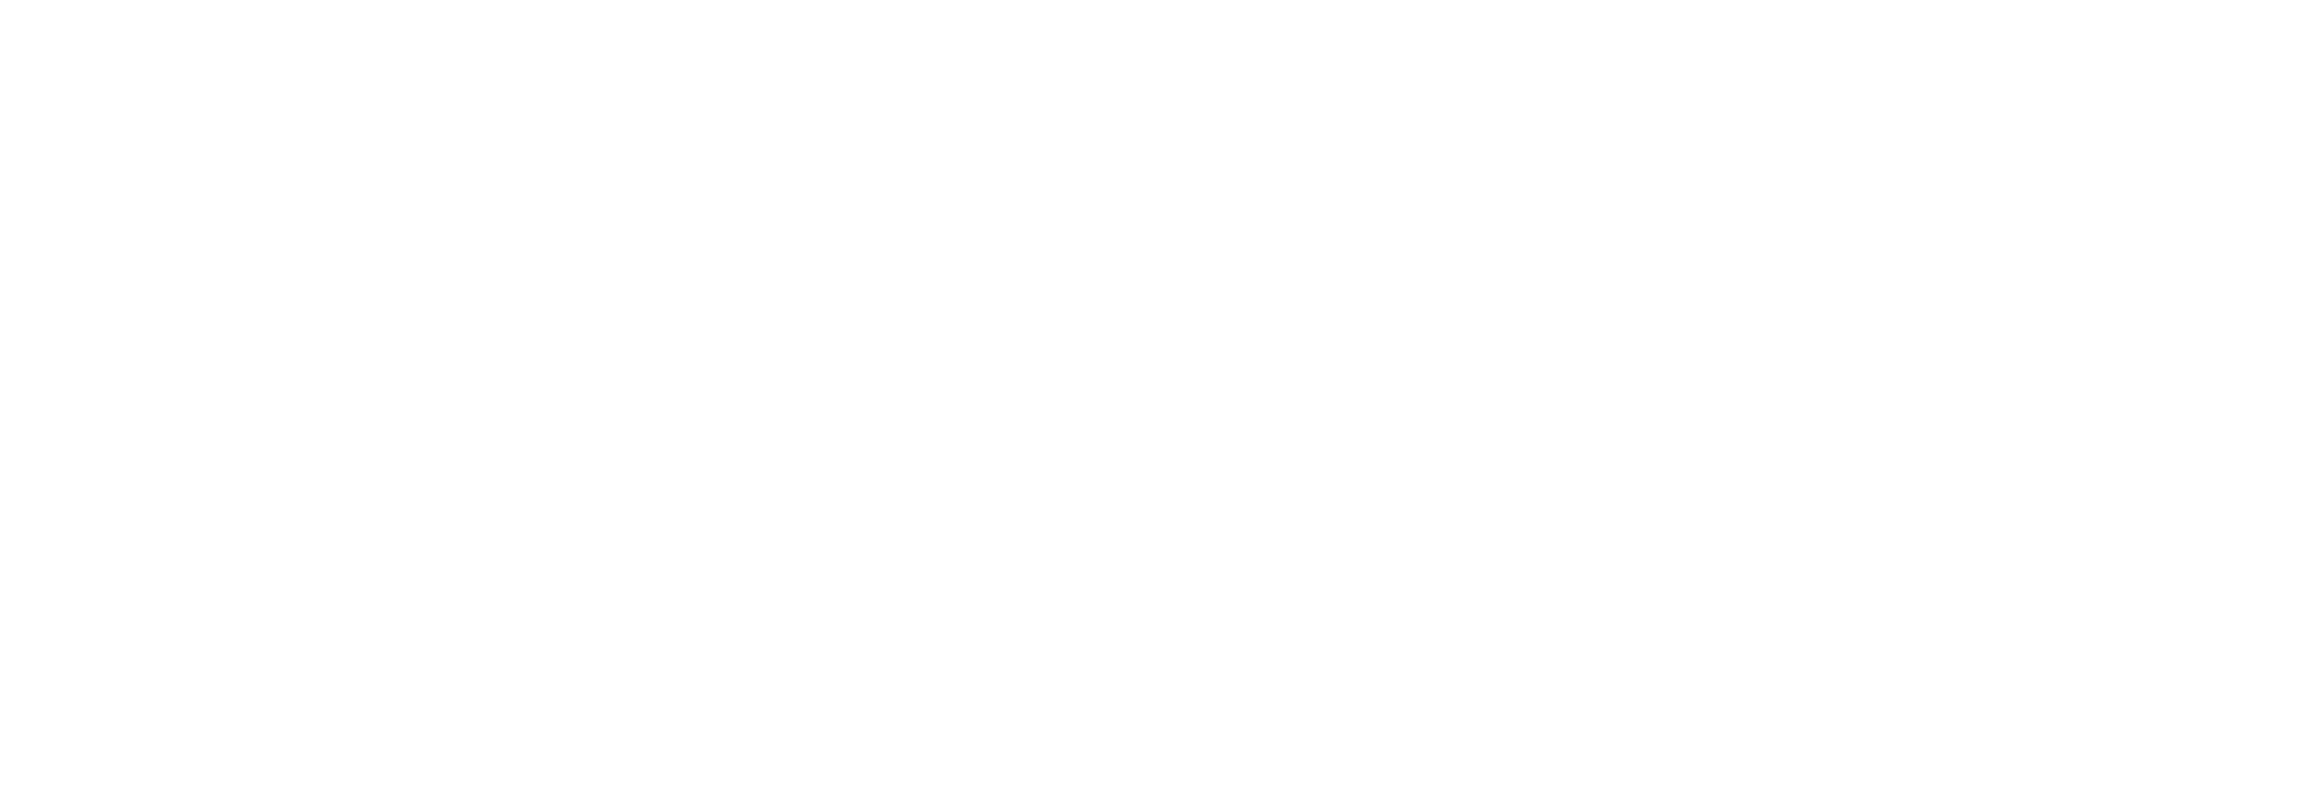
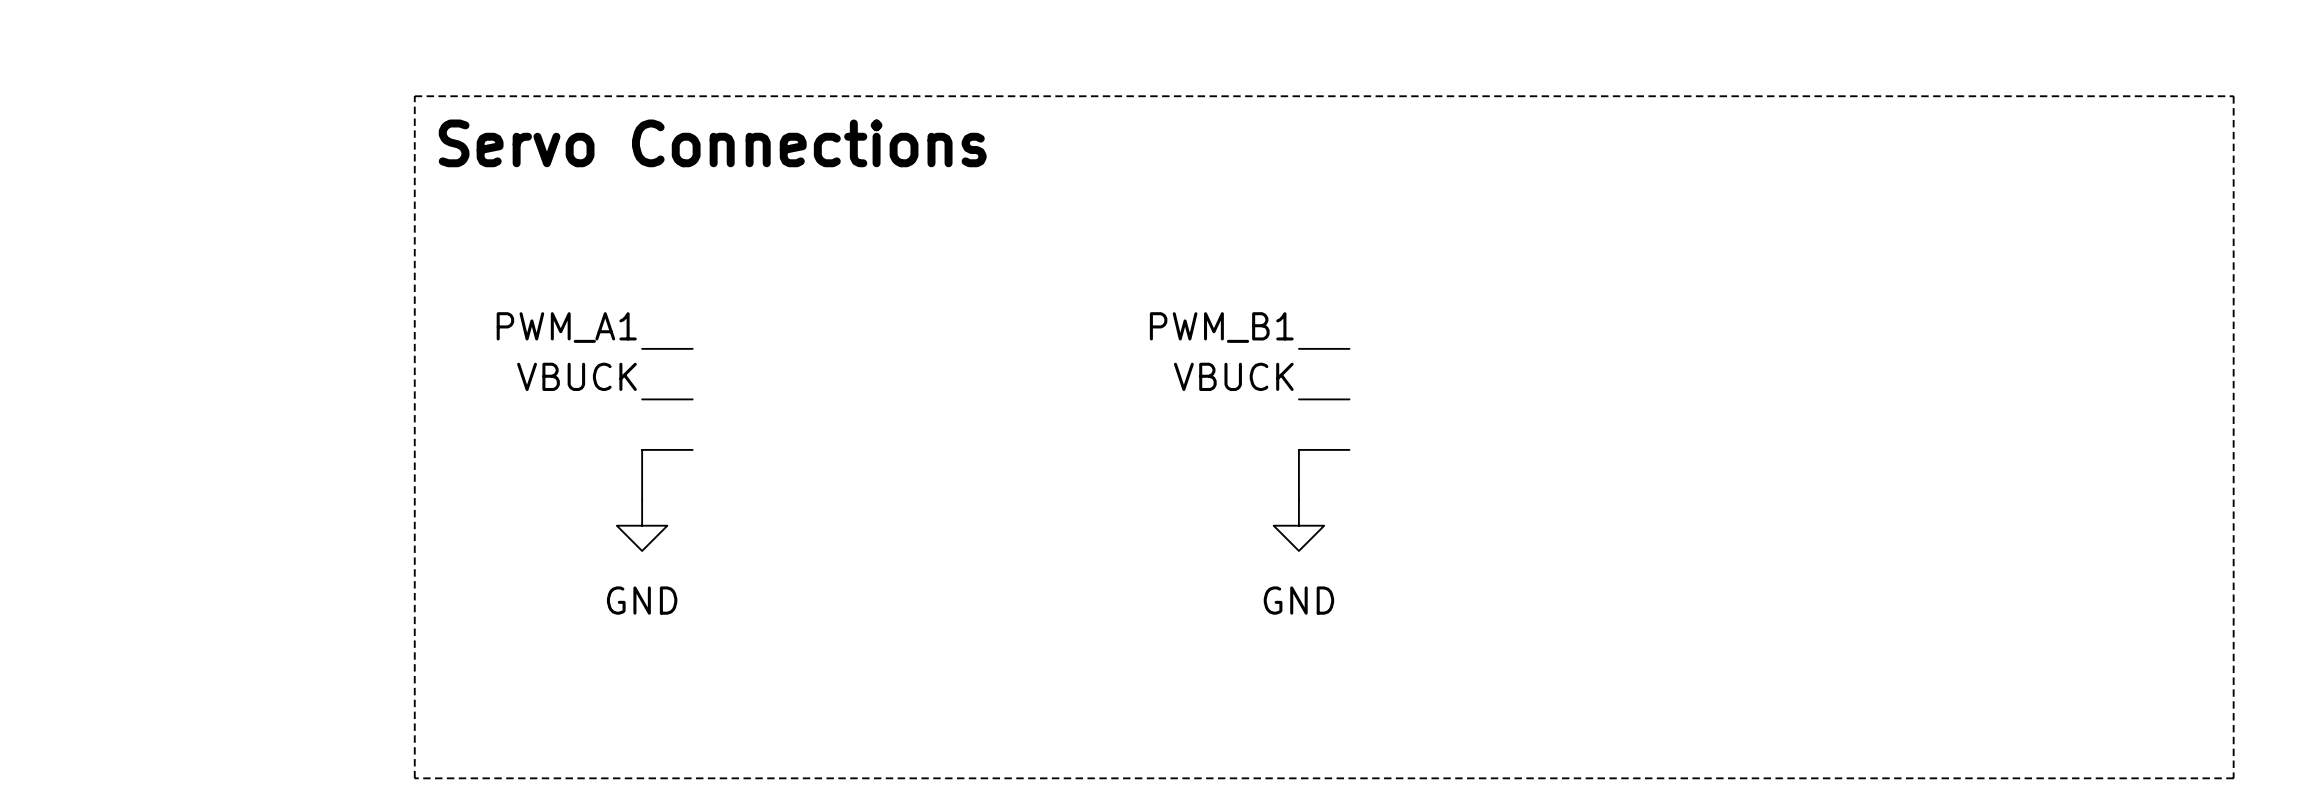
line: none -> (414, 96) (414, 778) (2233, 778) (2233, 96) (414, 96)
text: none -> Servo Connections (712, 143)
label: none -> PWM_A1 (566, 327)
label: none -> PWM_B1 (1221, 327)
wire: none -> (642, 348) (692, 348)
wire: none -> (1298, 348) (1349, 348)
label: none -> VBUCK (576, 376)
label: none -> VBUCK (1233, 376)
wire: none -> (642, 399) (692, 399)
wire: none -> (1298, 399) (1349, 399)
wire: none -> (692, 449) (642, 449) (642, 500)
wire: none -> (1349, 449) (1298, 449) (1298, 500)
power symbol: none -> GND (642, 525)
power symbol: none -> GND (1298, 525)

